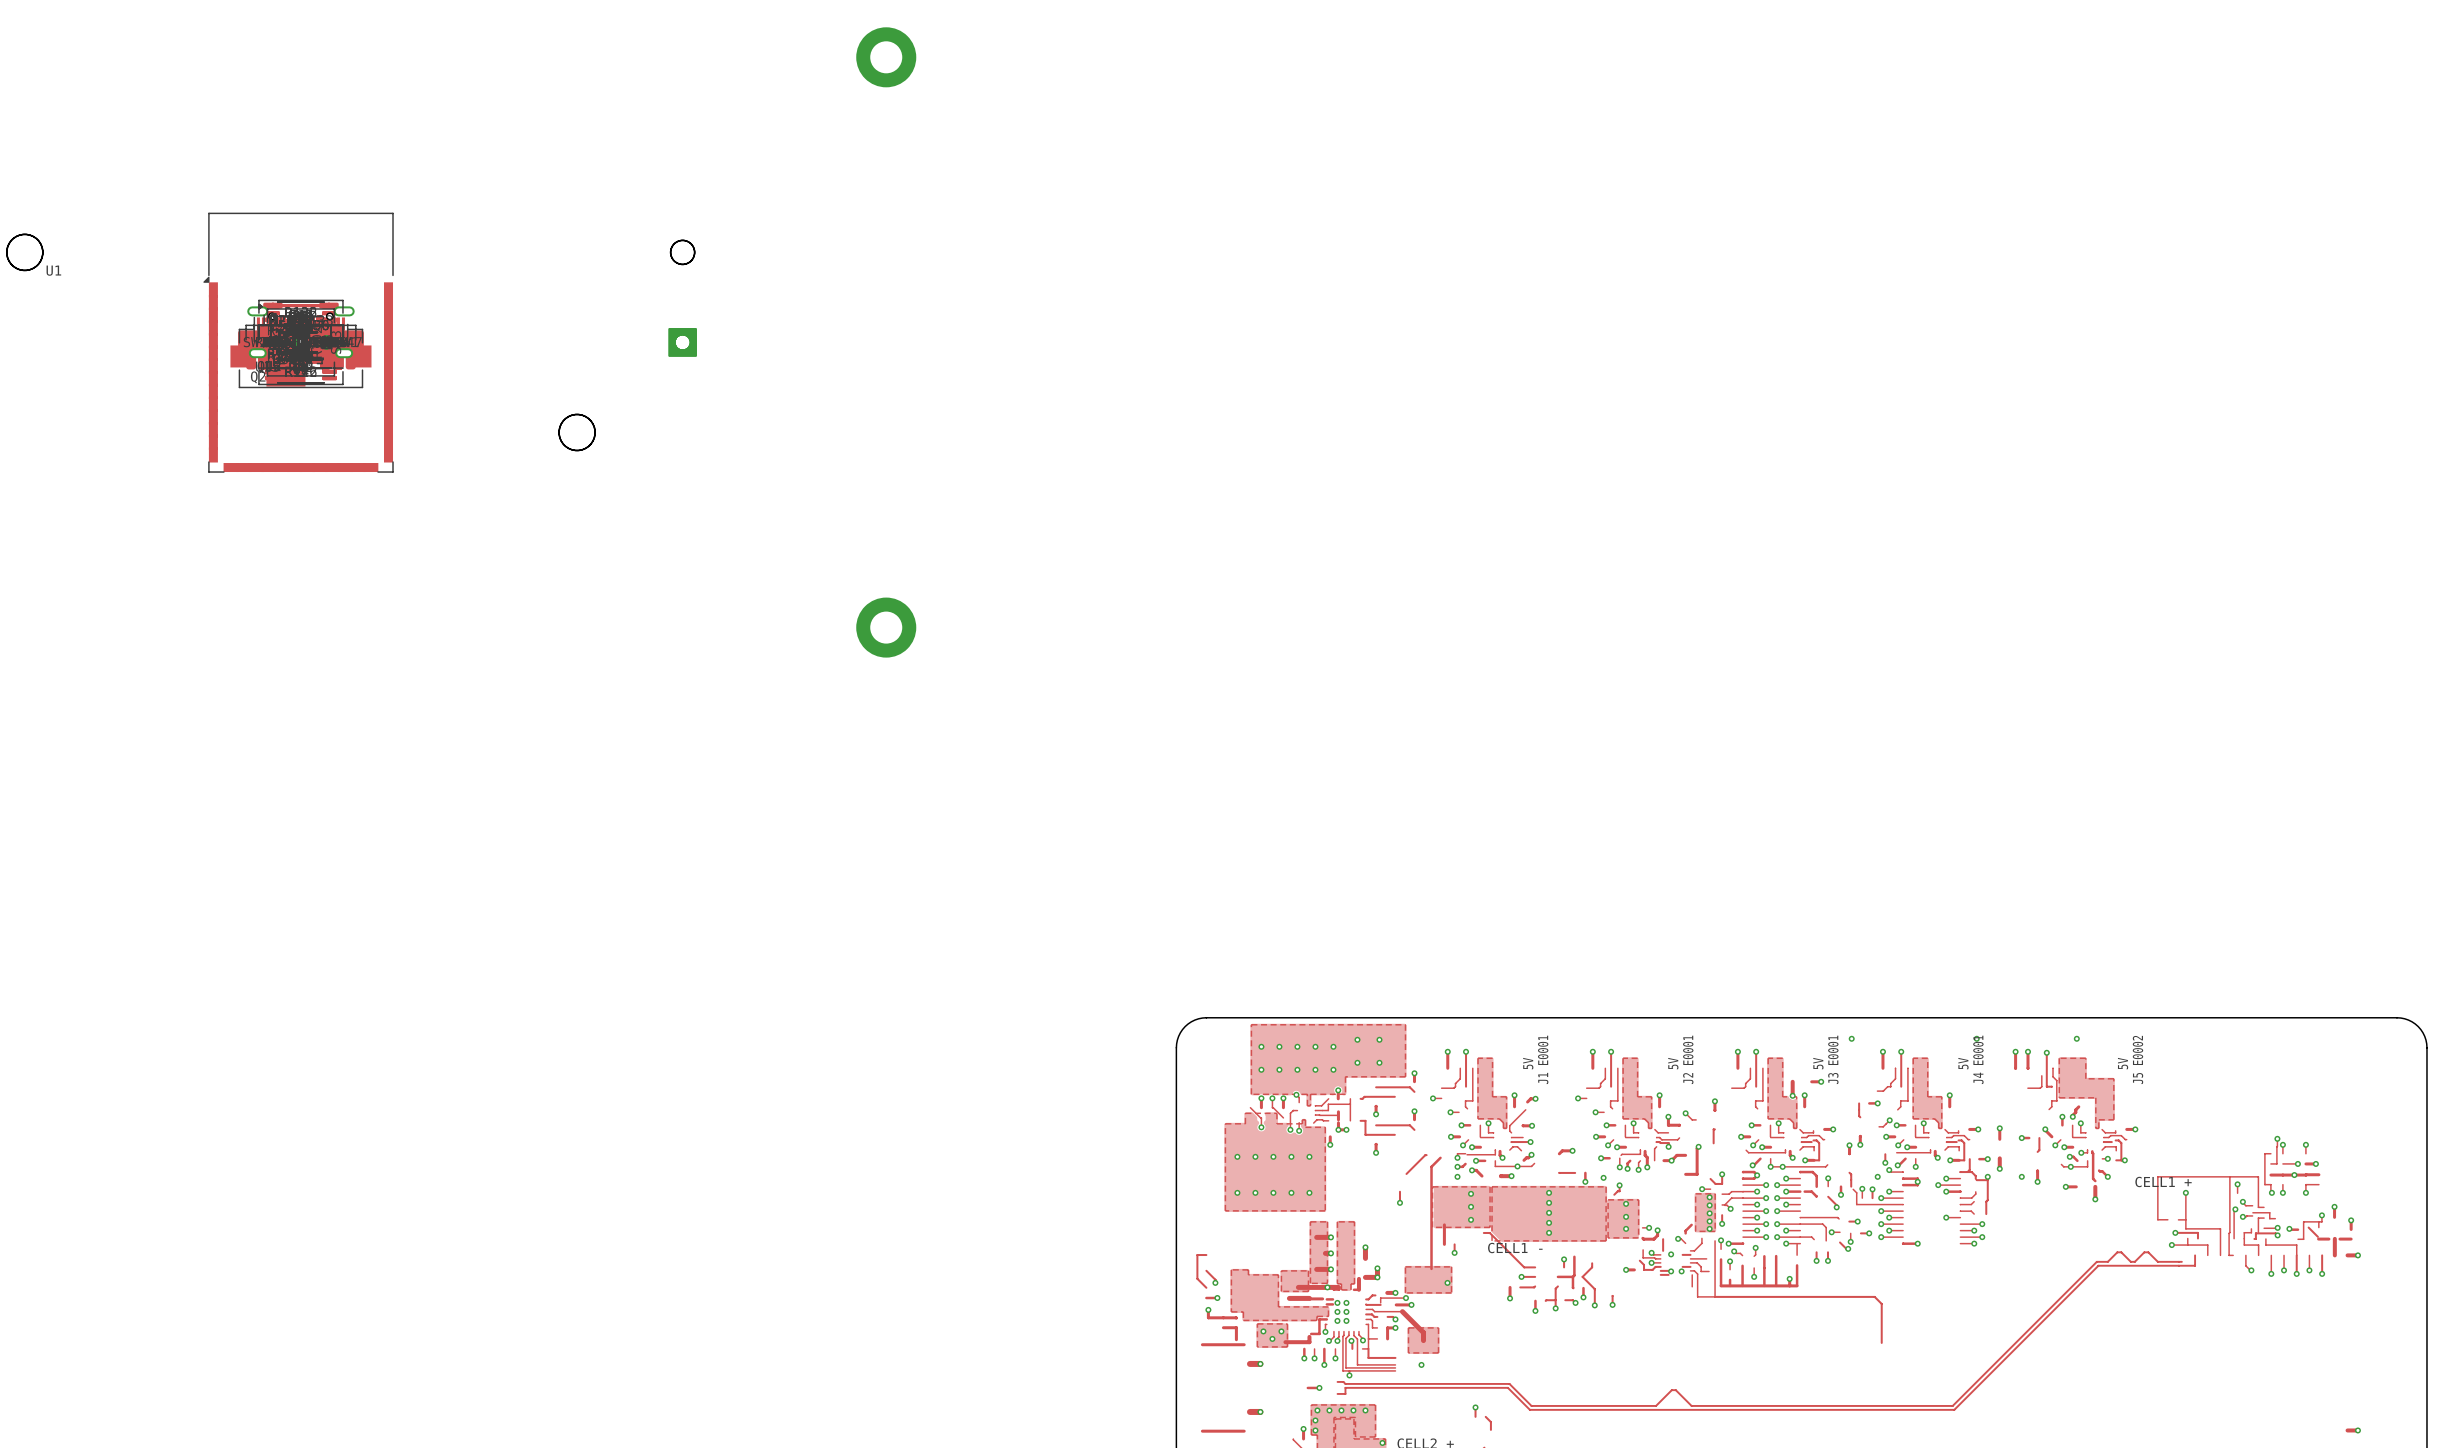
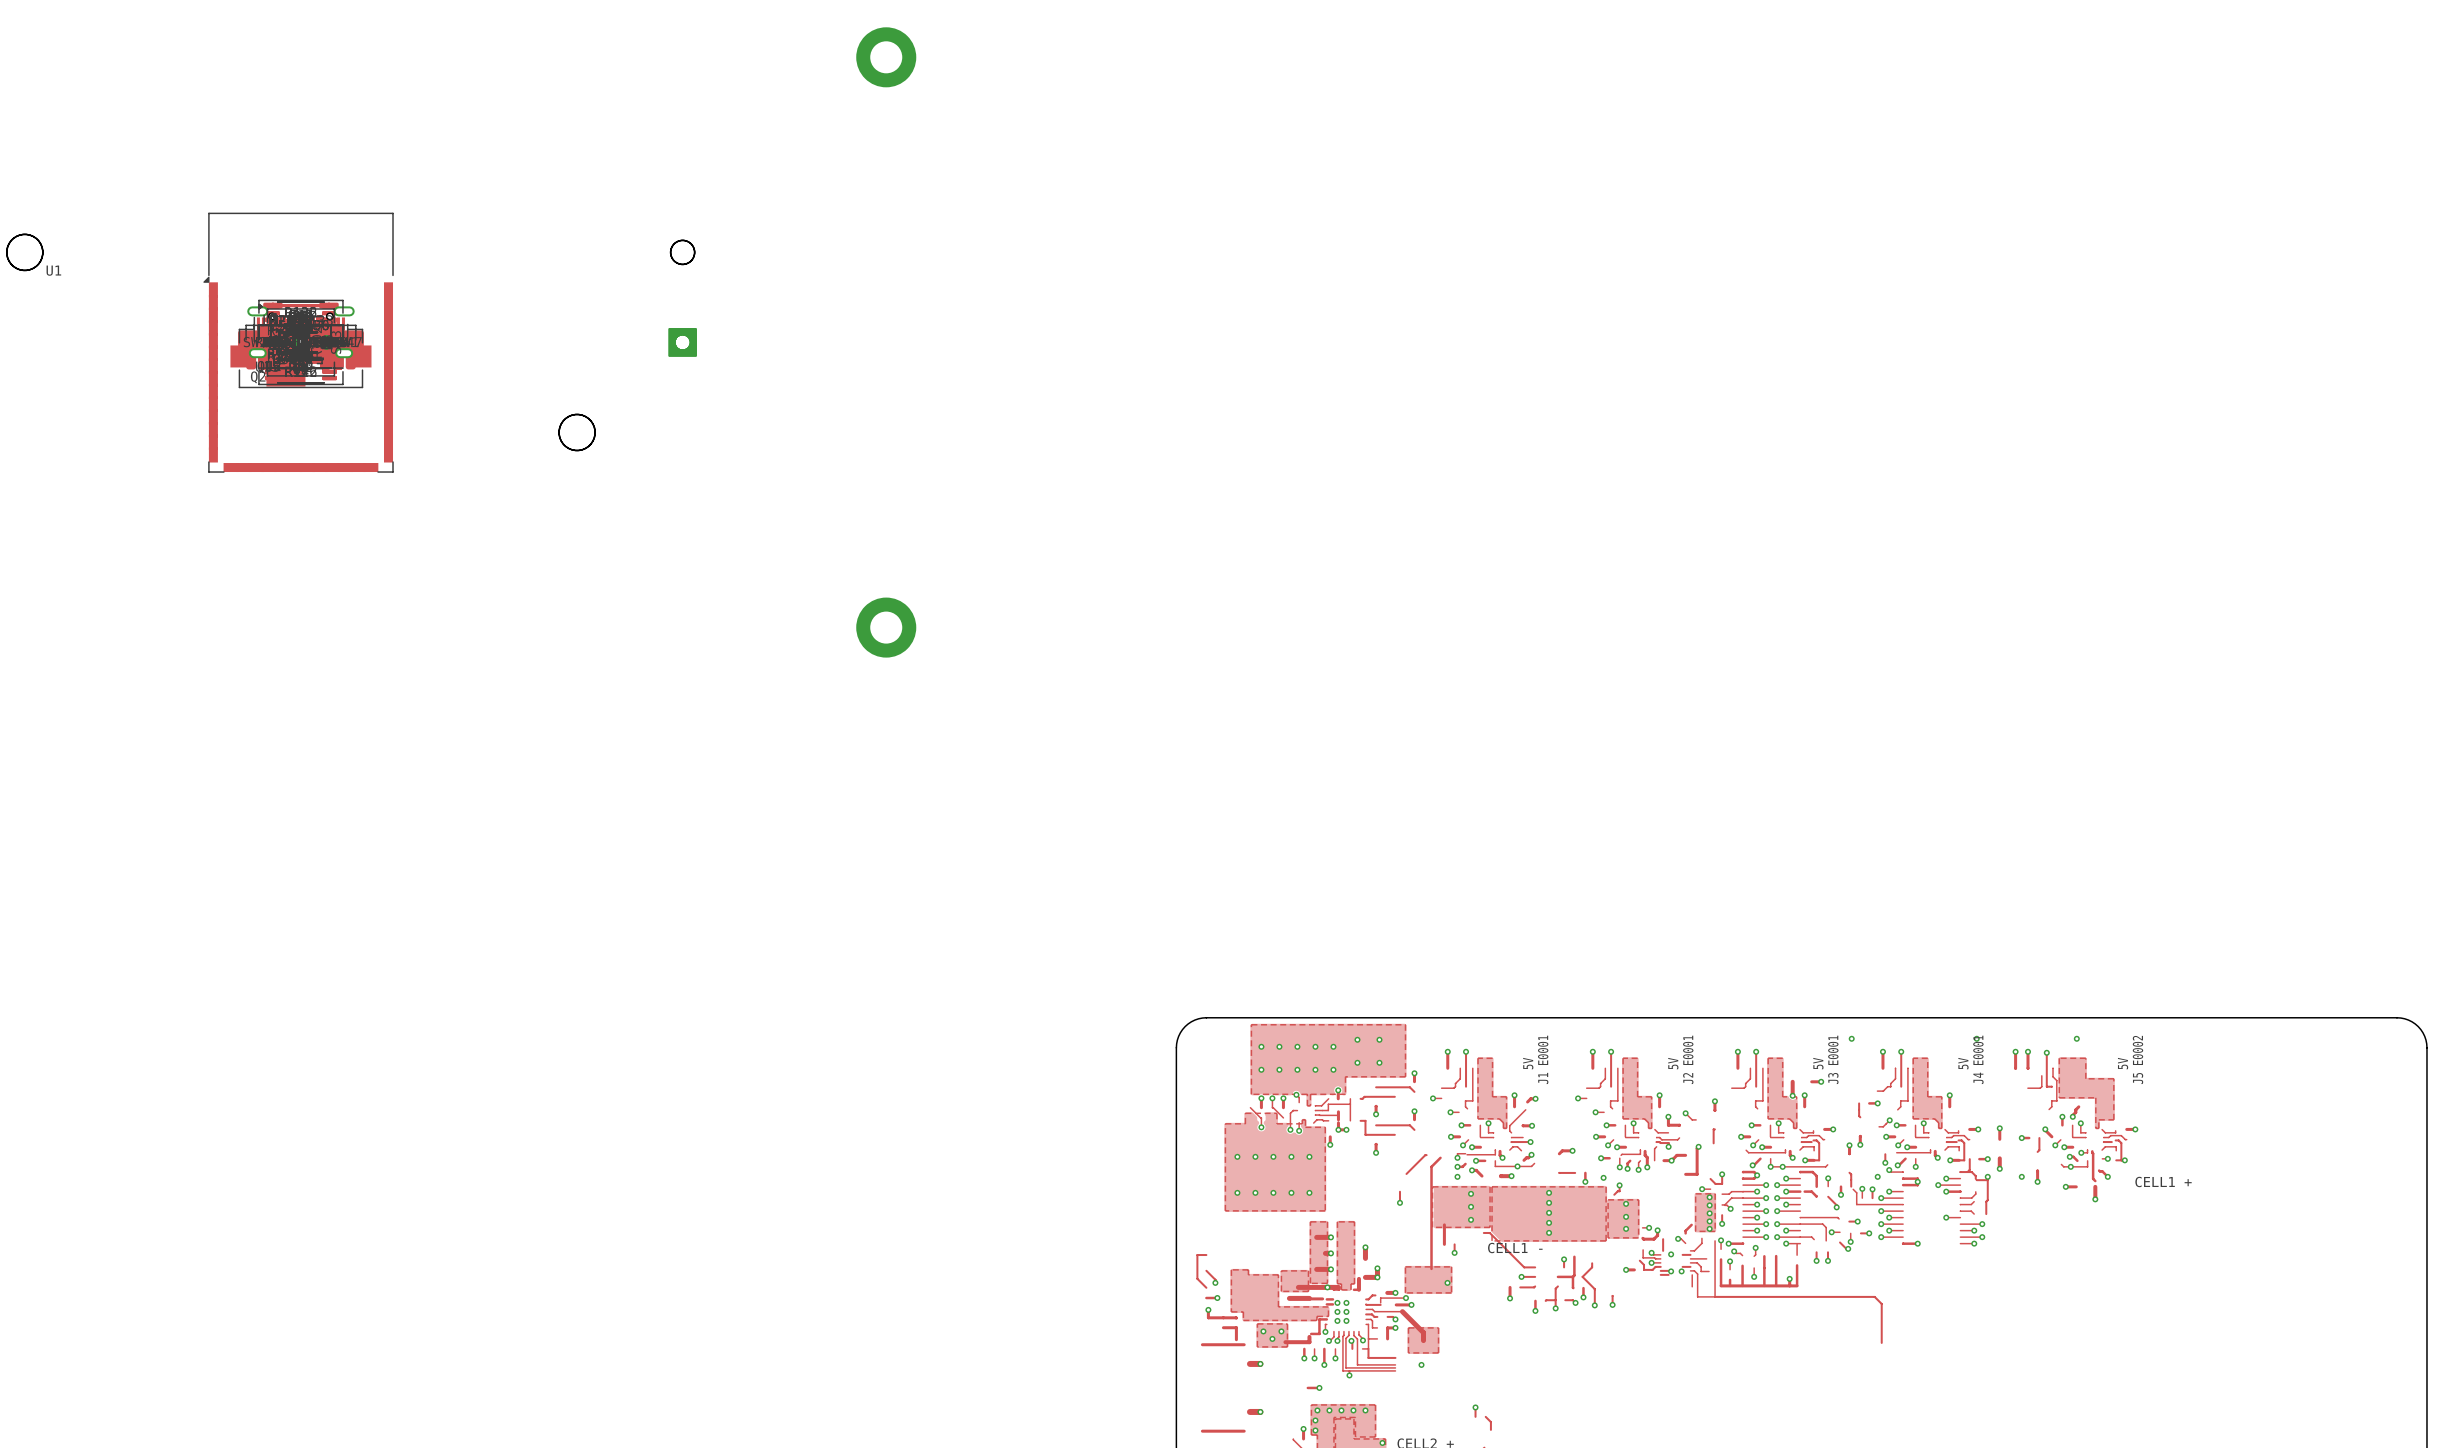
track: (2277, 1138) (2276, 1163) (2270, 1163) -> none
via: (2277, 1138) -> none
track: (2282, 1144) (2282, 1153) -> none
via: (2282, 1144) -> none
track: (2305, 1144) (2305, 1153) -> none
via: (2305, 1144) -> none
track: (2270, 1153) (2264, 1153) (2264, 1184) (2270, 1184) (2271, 1192) -> none
track: (2282, 1163) (2297, 1163) -> none
via: (2297, 1163) -> none
track: (2305, 1163) (2315, 1163) -> none
via: (2315, 1163) -> none
track: (2318, 1174) (2270, 1175) -> none
via: (2294, 1175) -> none
track: (2229, 1176) (2229, 1255) (2233, 1255) -> none
track: (2237, 1184) (2237, 1193) -> none
via: (2237, 1184) -> none
track: (2282, 1184) (2282, 1192) -> none
track: (2318, 1184) (2305, 1184) (2305, 1192) -> none
track: (2185, 1192) (2185, 1228) (2220, 1228) (2220, 1255) -> none
via: (2185, 1192) -> none
via: (2271, 1192) -> none
via: (2282, 1192) -> none
via: (2305, 1192) -> none
via: (2242, 1201) -> none
track: (2242, 1202) (2245, 1205) (2252, 1205) -> none
track: (2334, 1206) (2334, 1217) -> none
via: (2334, 1206) -> none
track: (2264, 1207) (2258, 1207) (2258, 1176) (2157, 1176) (2157, 1219) (2167, 1219) -> none
track: (2235, 1209) (2234, 1238) -> none
via: (2235, 1209) -> none
track: (2252, 1212) (2269, 1212) (2269, 1218) (2275, 1218) -> none
track: (2252, 1215) (2242, 1216) -> none
track: (2321, 1215) (2321, 1221) (2303, 1221) (2303, 1239) (2298, 1239) -> none
via: (2321, 1215) -> none
via: (2242, 1216) -> none
track: (2264, 1218) (2258, 1218) (2258, 1233) -> none
track: (2178, 1219) (2185, 1219) -> none
track: (2351, 1220) (2351, 1229) -> none
via: (2351, 1220) -> none
track: (2318, 1221) (2318, 1227) -> none
track: (2277, 1227) (2264, 1228) -> none
via: (2277, 1227) -> none
track: (2308, 1227) (2317, 1236) -> none
track: (2251, 1228) (2251, 1232) (2244, 1232) (2244, 1245) (2258, 1245) (2258, 1255) -> none
via: (2289, 1228) -> none
track: (2289, 1229) (2298, 1229) -> none
track: (2175, 1232) (2197, 1232) (2197, 1238) -> none
via: (2175, 1232) -> none
track: (2277, 1235) (2275, 1233) (2255, 1233) (2254, 1238) -> none
via: (2277, 1235) -> none
track: (2187, 1238) (2187, 1245) -> none
track: (2265, 1238) (2265, 1245) (2296, 1245) (2296, 1273) -> none
track: (2334, 1238) (2334, 1255) -> none
track: (2318, 1239) (2328, 1239) -> none
track: (2339, 1239) (2351, 1239) -> none
track: (2171, 1245) (2207, 1245) (2207, 1255) -> none
via: (2171, 1245) -> none
track: (2195, 1255) (2195, 1265) (2098, 1265) (1954, 1409) (1529, 1409) (1507, 1387) (1345, 1387) (1345, 1393) (1337, 1393) -> none
track: (2245, 1255) (2245, 1265) (2251, 1270) -> none
track: (2271, 1255) (2271, 1273) -> none
track: (2284, 1255) (2284, 1270) -> none
track: (2309, 1255) (2309, 1270) -> none
track: (2322, 1255) (2322, 1273) -> none
track: (2347, 1255) (2357, 1255) -> none
via: (2357, 1255) -> none
track: (2181, 1261) (2157, 1261) (2148, 1252) (2144, 1252) (2134, 1261) (2130, 1261) (2121, 1252) (2117, 1252) (2107, 1261) (2096, 1261) (1952, 1405) (1691, 1405) (1675, 1390) (1671, 1390) (1656, 1405) (1531, 1405) (1509, 1383) (1345, 1383) (1337, 1381) -> none
via: (2251, 1270) -> none
via: (2284, 1270) -> none
via: (2309, 1270) -> none
via: (2271, 1273) -> none
via: (2296, 1273) -> none
via: (2322, 1273) -> none
track: (2347, 1430) (2357, 1430) -> none
via: (2357, 1430) -> none

